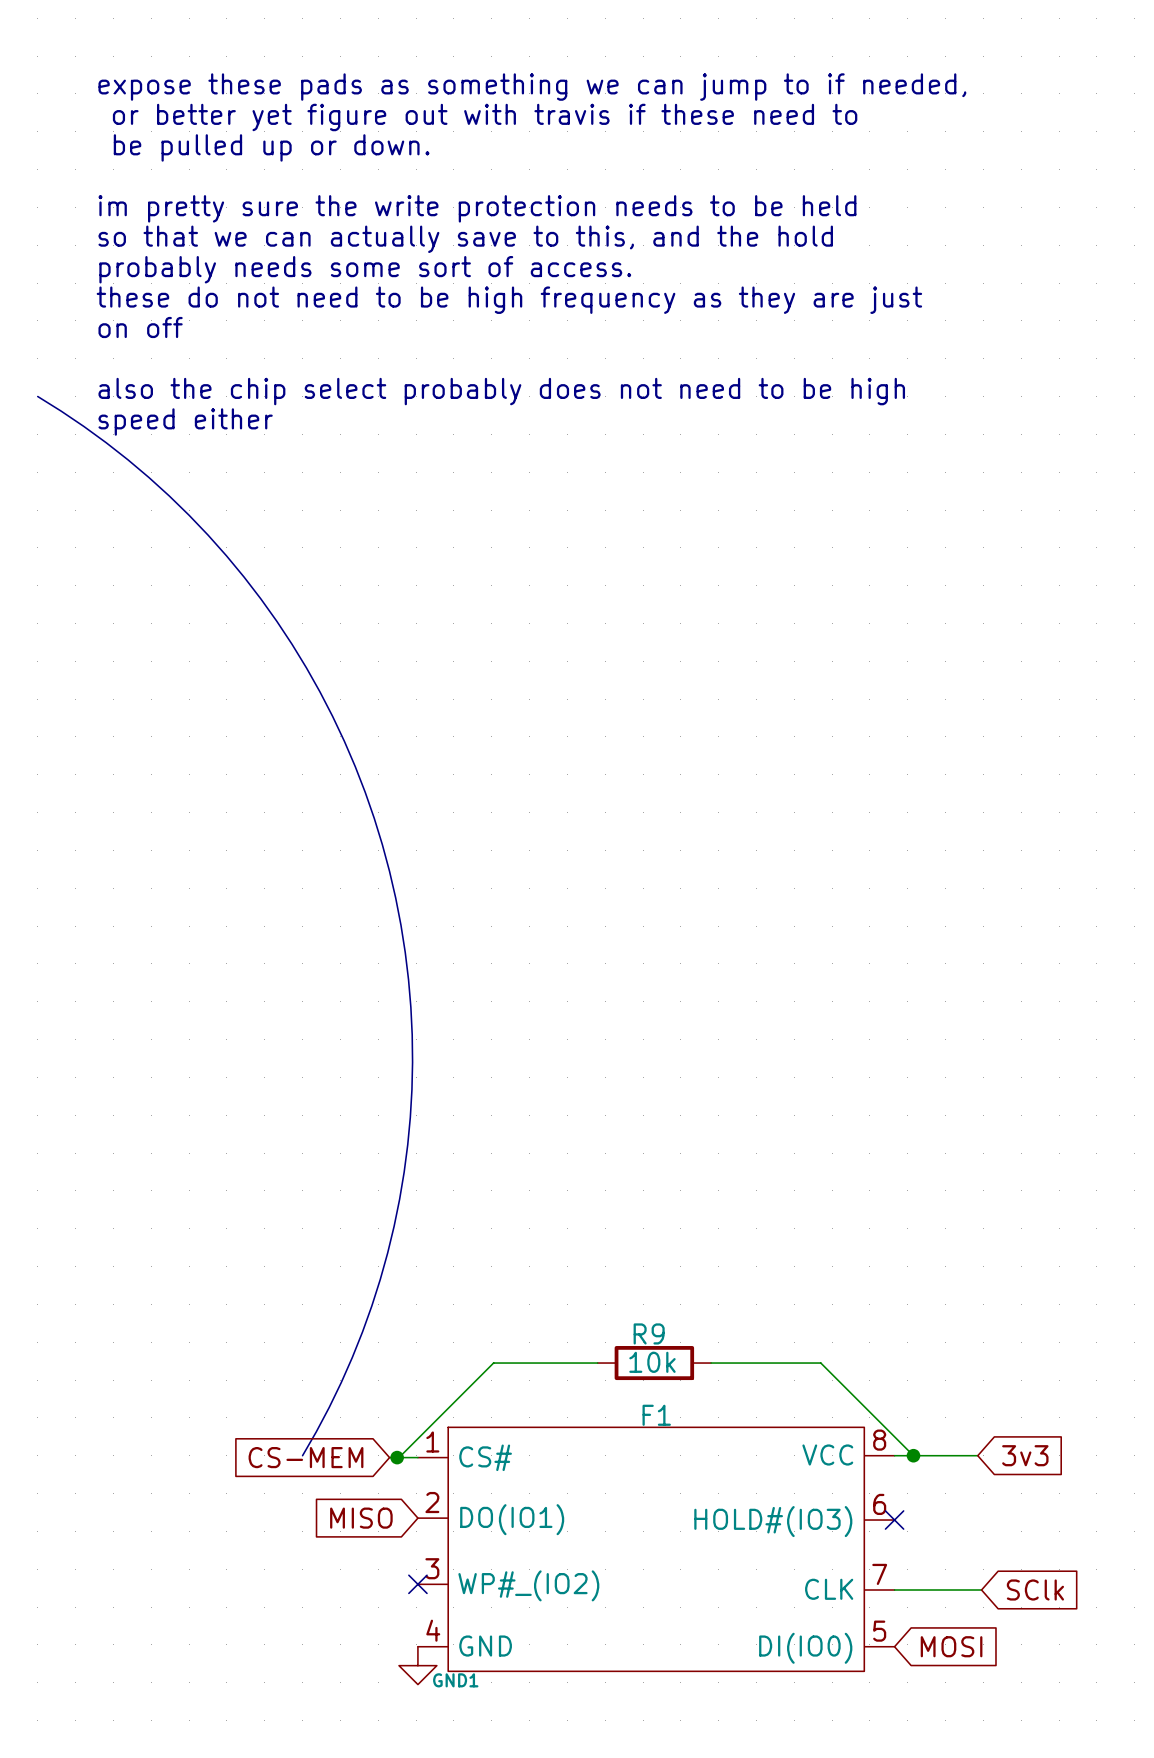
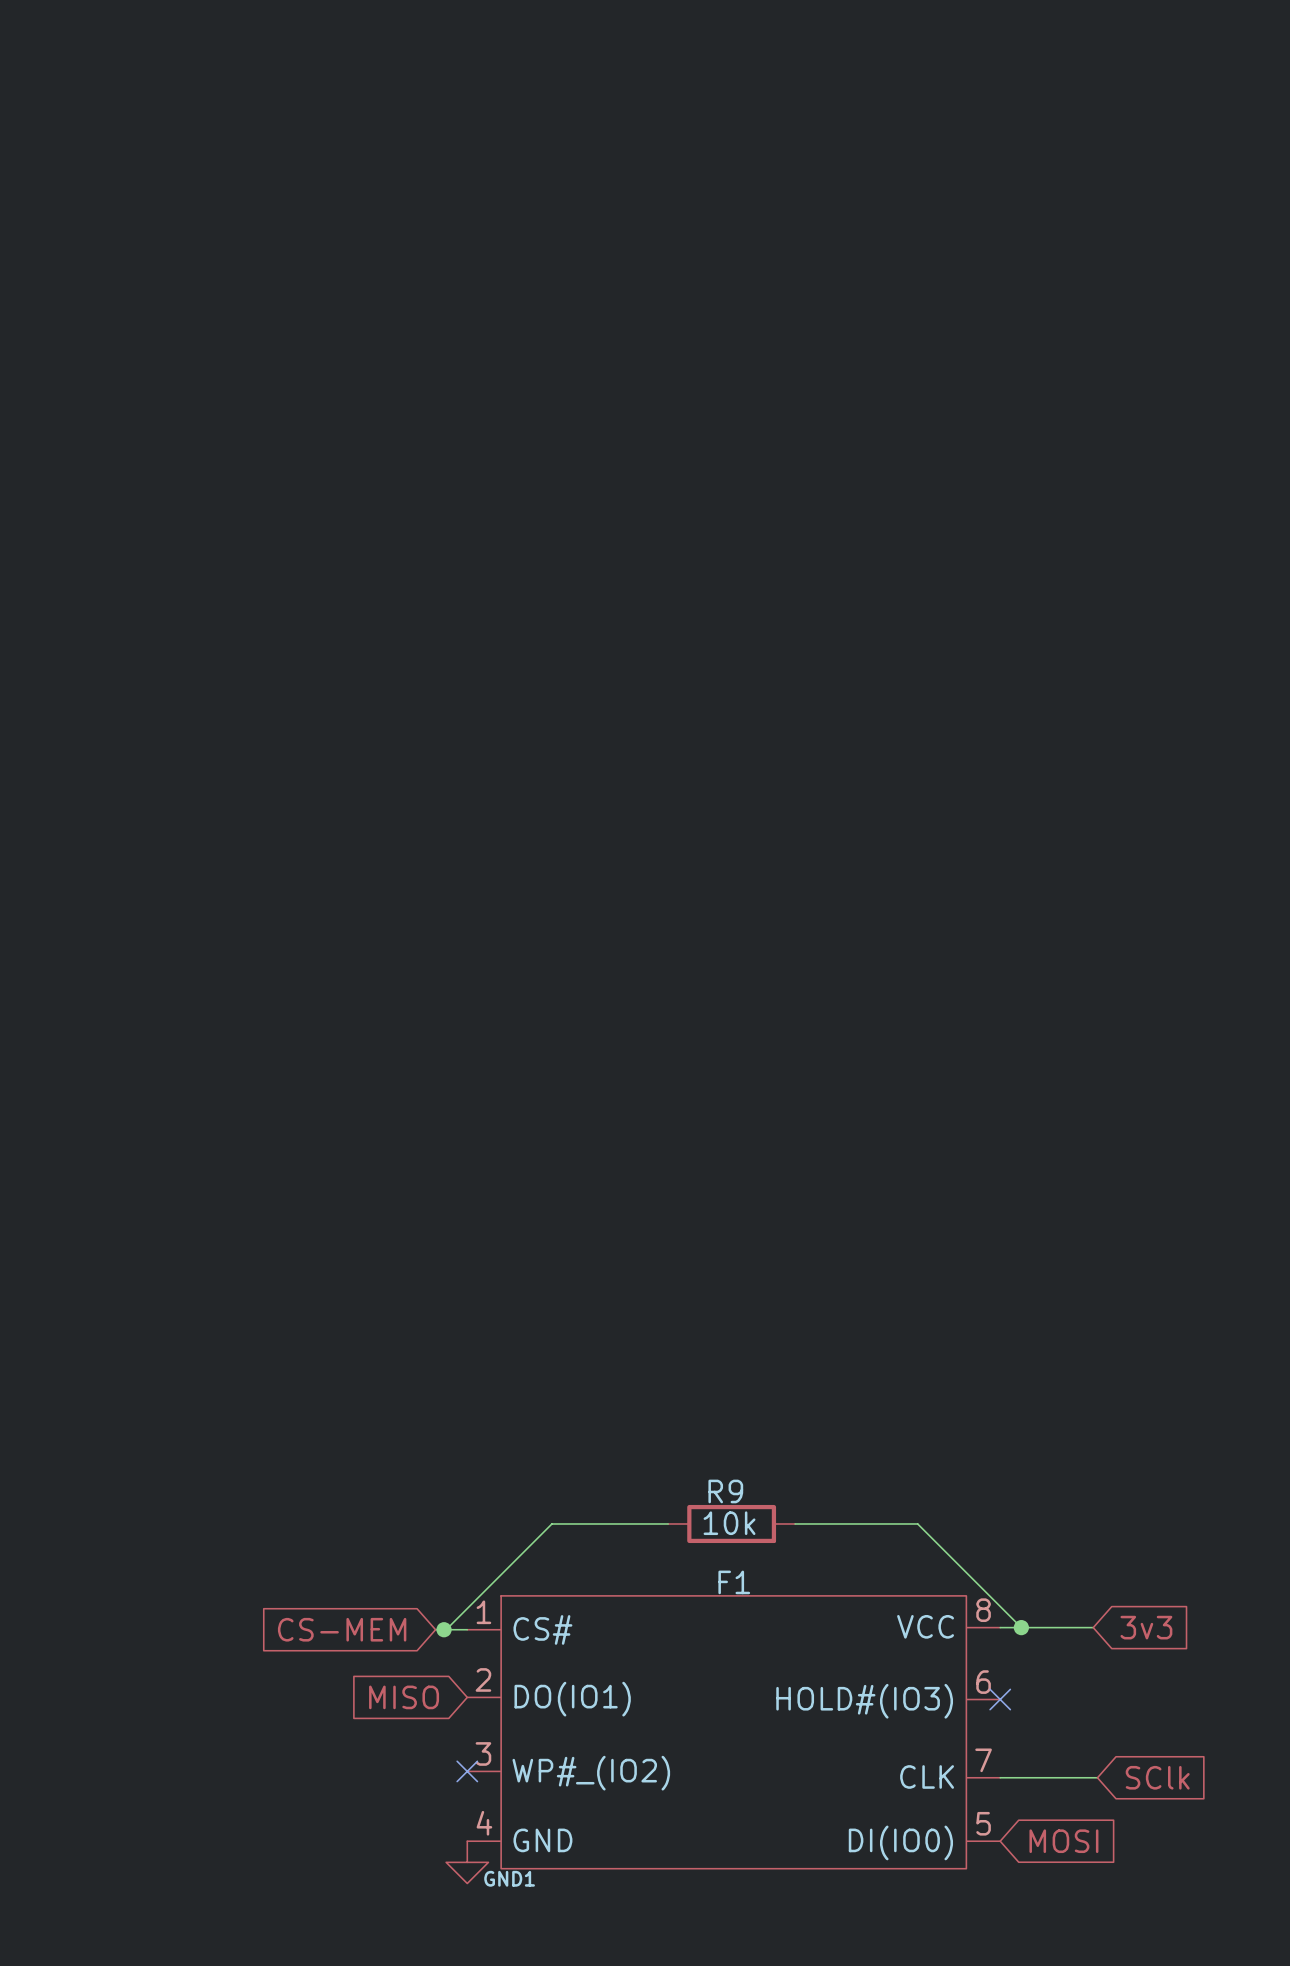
text: expose these pads as something we can jump to if needed, (532, 87) -> none
text: or better yet figure out with travis if these need to (485, 117) -> none
text: be pulled up or down. (271, 147) -> none
text: im pretty sure the write protection needs to be held (477, 208) -> none
text: so that we can actually save to this, and the hold (465, 239) -> none
text: probably needs some sort of access. (365, 269) -> none
text: these do not need to be high frequency as they are just (509, 300) -> none
text: on off (140, 327) -> none
text: also the chip select probably does not need to be high (501, 391) -> none
line: (37, 396) (106, 442) (169, 496) (226, 555) (260, 598) (306, 667) (344, 741) (374, 818) (389, 871) (400, 925) (410, 1007) (411, 1089) (404, 1172) (387, 1253) (371, 1305) (341, 1382) (302, 1455) -> none
text: speed either (185, 422) -> none

